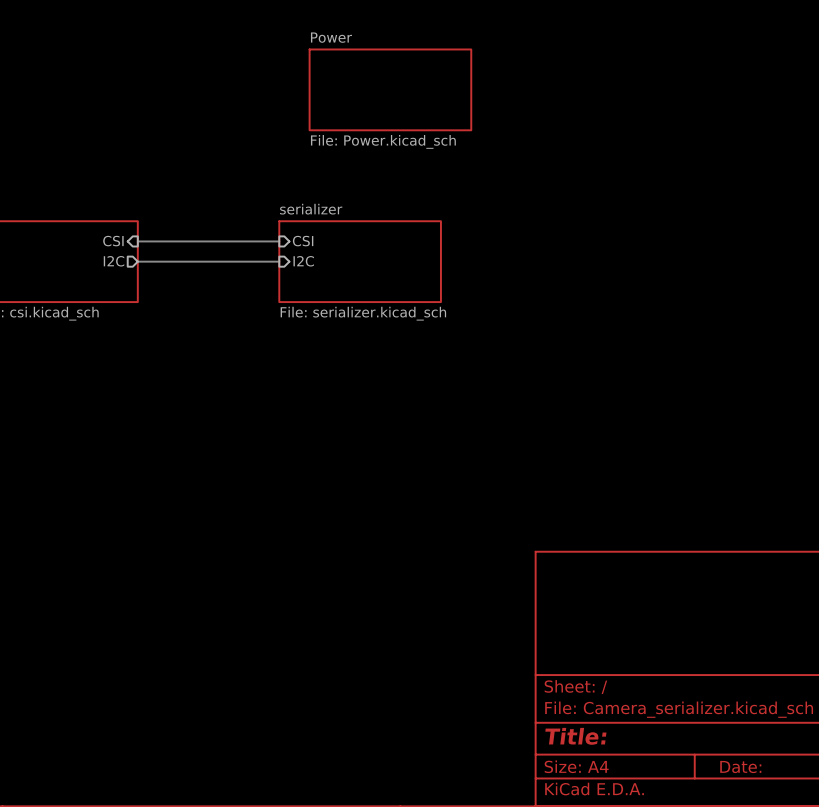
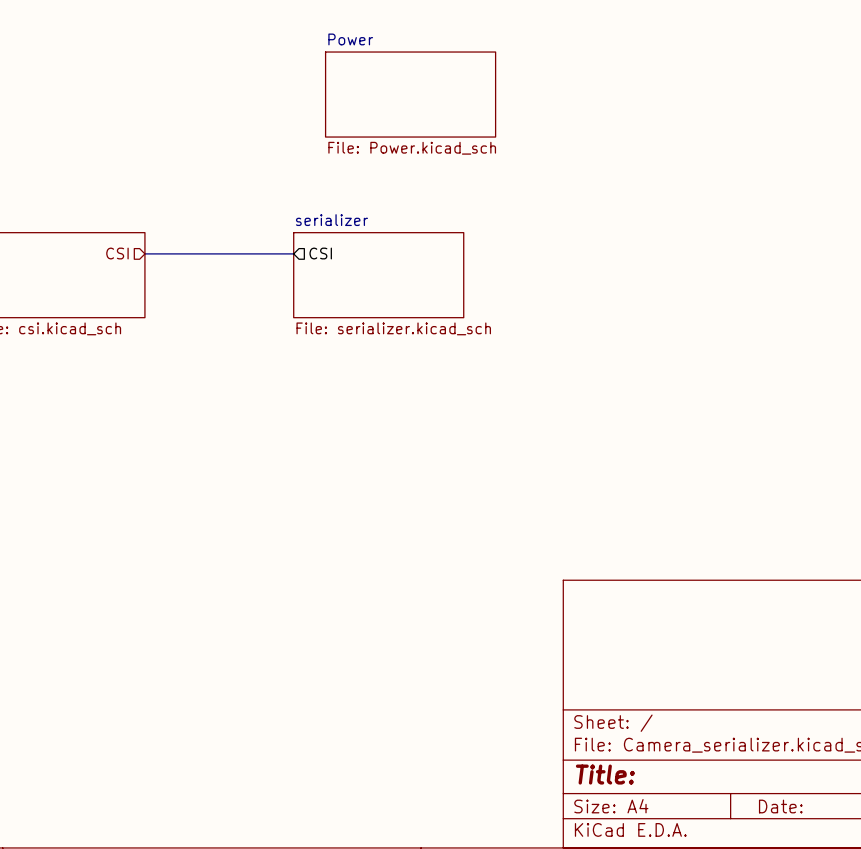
hierarchical label shape: output (113, 241) -> input (117, 253)
sheet pin shape: input (303, 241) -> output (320, 253)
hierarchical label: I2C (114, 261) -> none
bus: (137, 261) (279, 261) -> none
hierarchical label: I2C (303, 261) -> none

